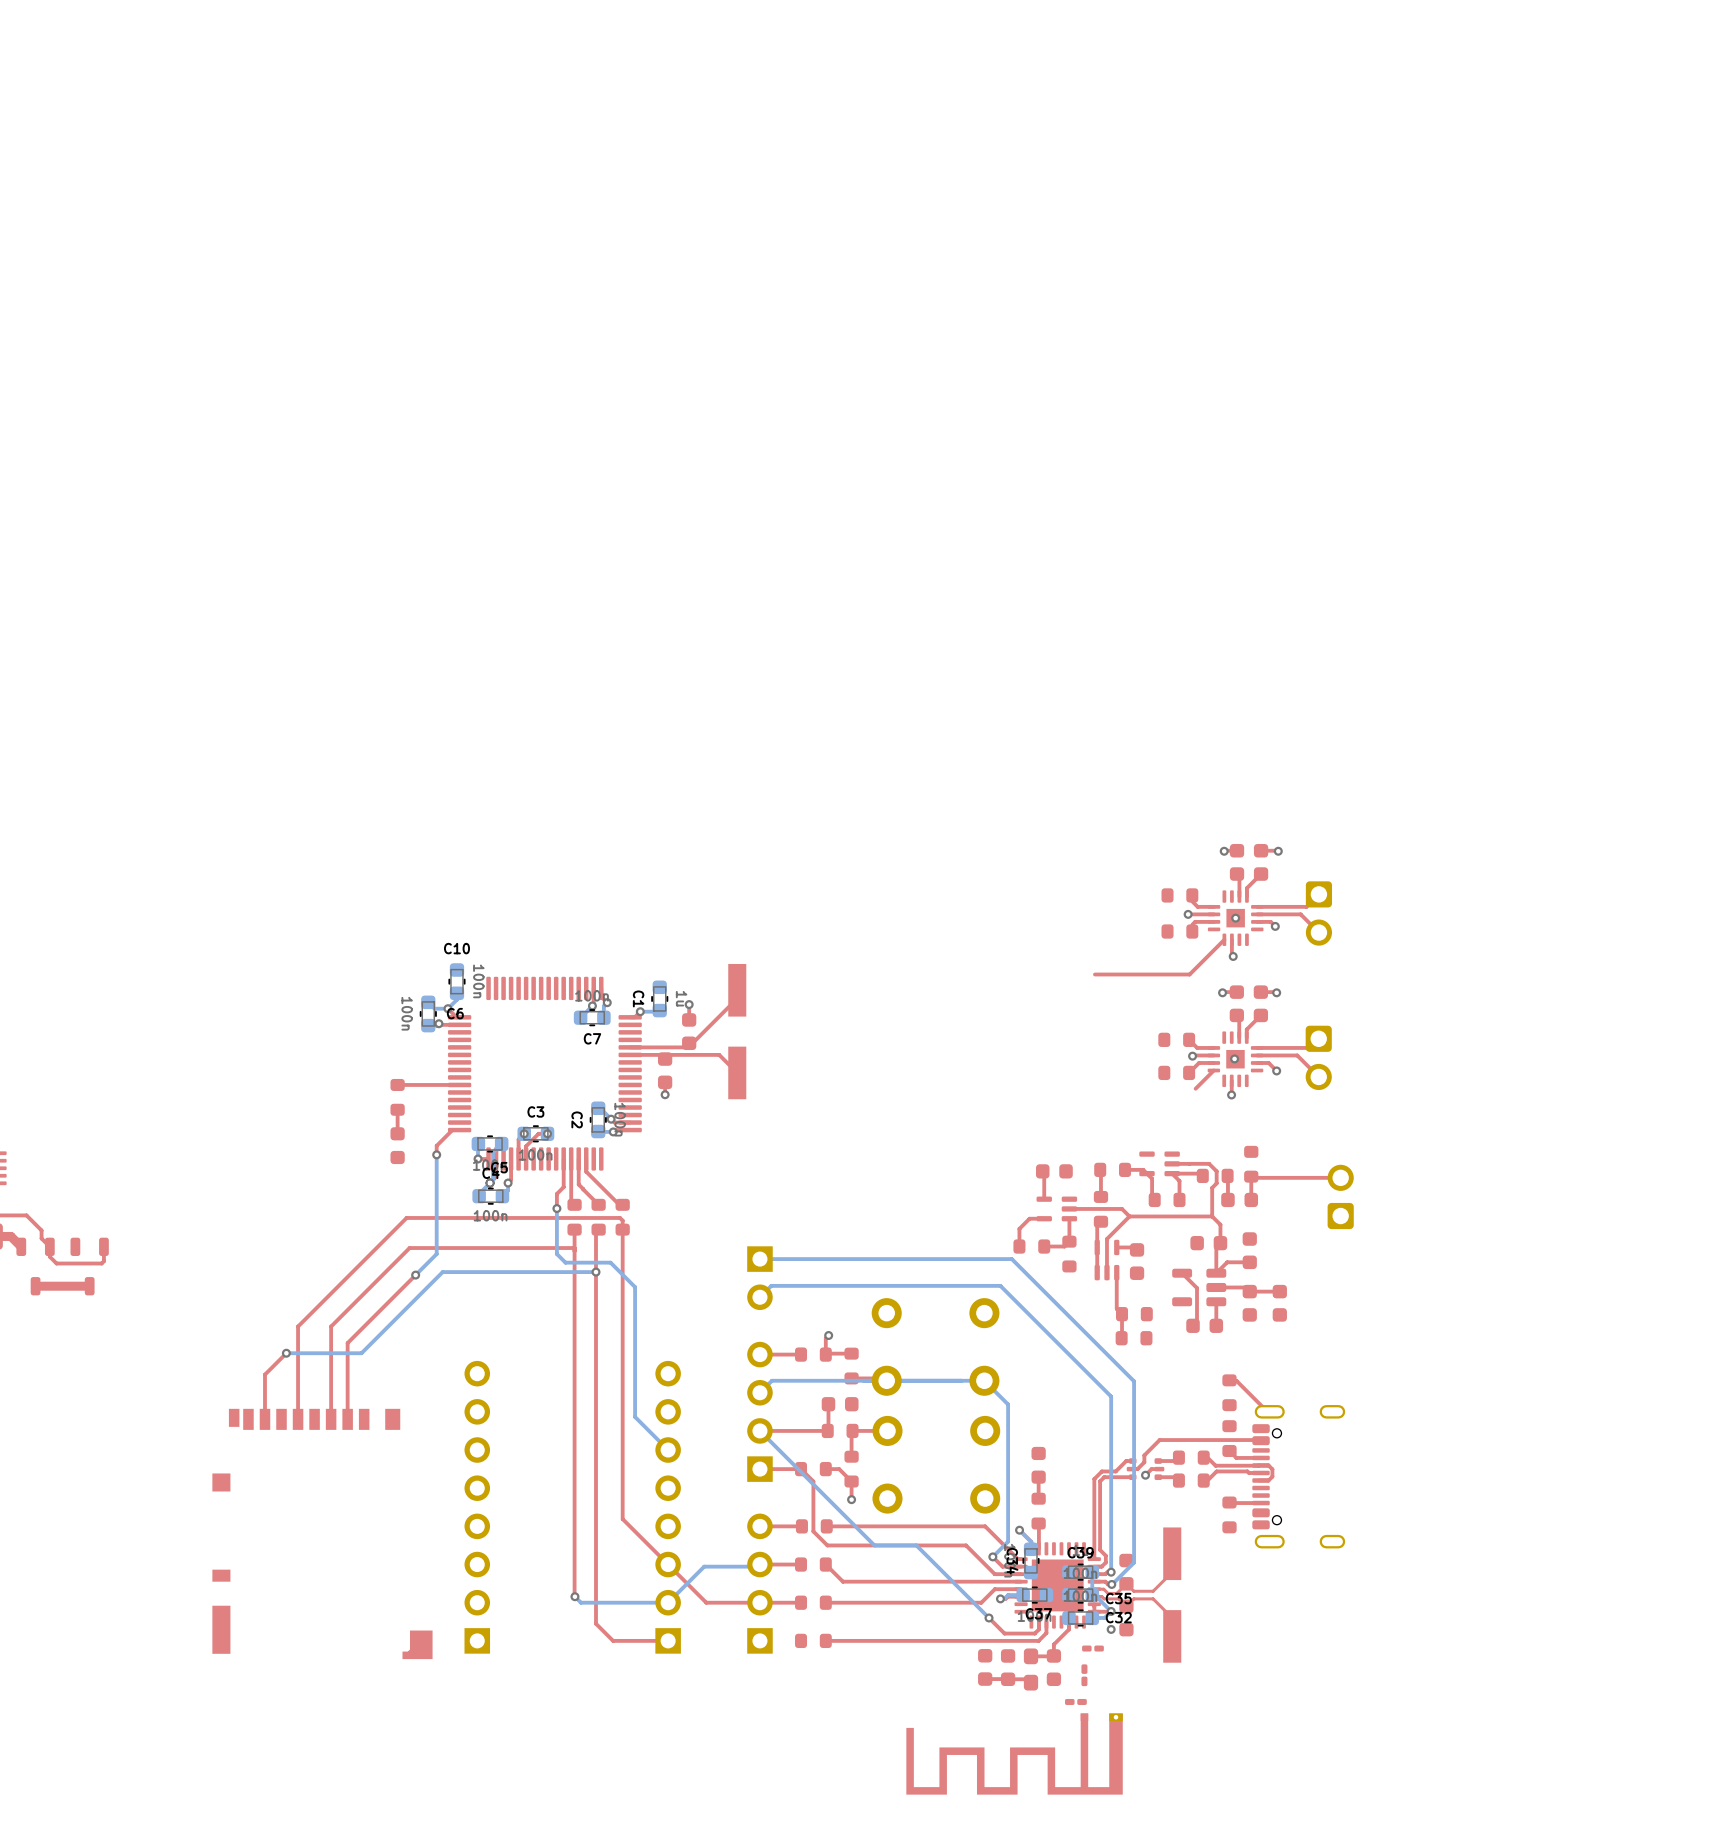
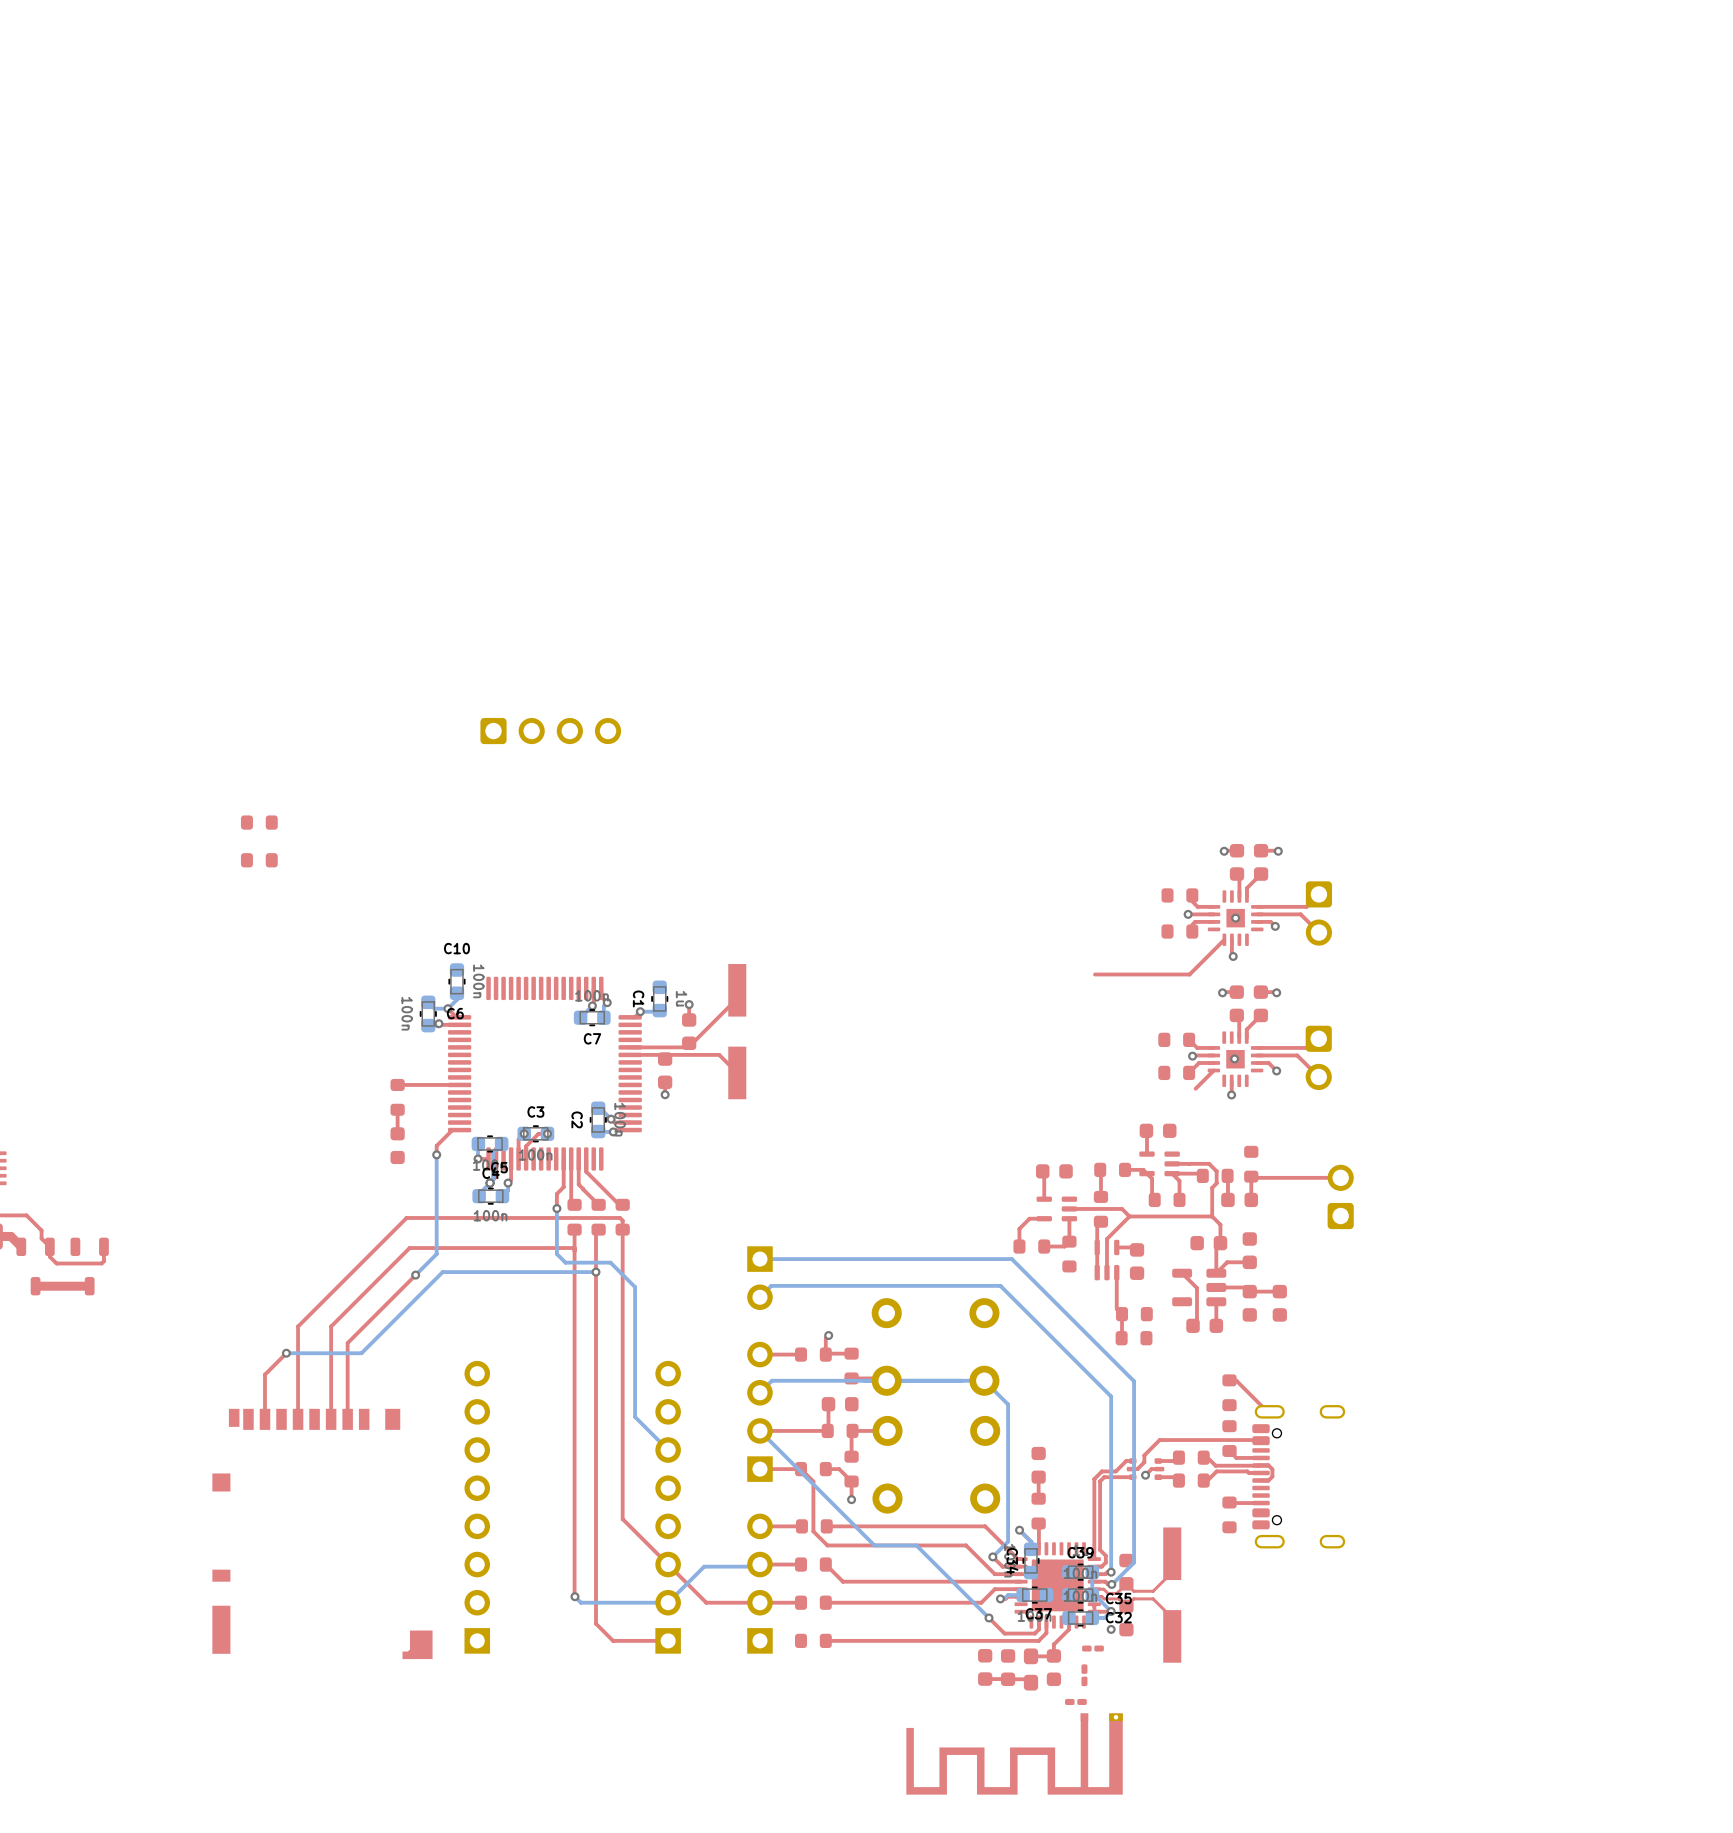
part: none -> (550, 731)
part: none -> (259, 822)
part: none -> (259, 860)
top track: none -> (1146, 1130) (1147, 1154)
part: none -> (1158, 1130)

